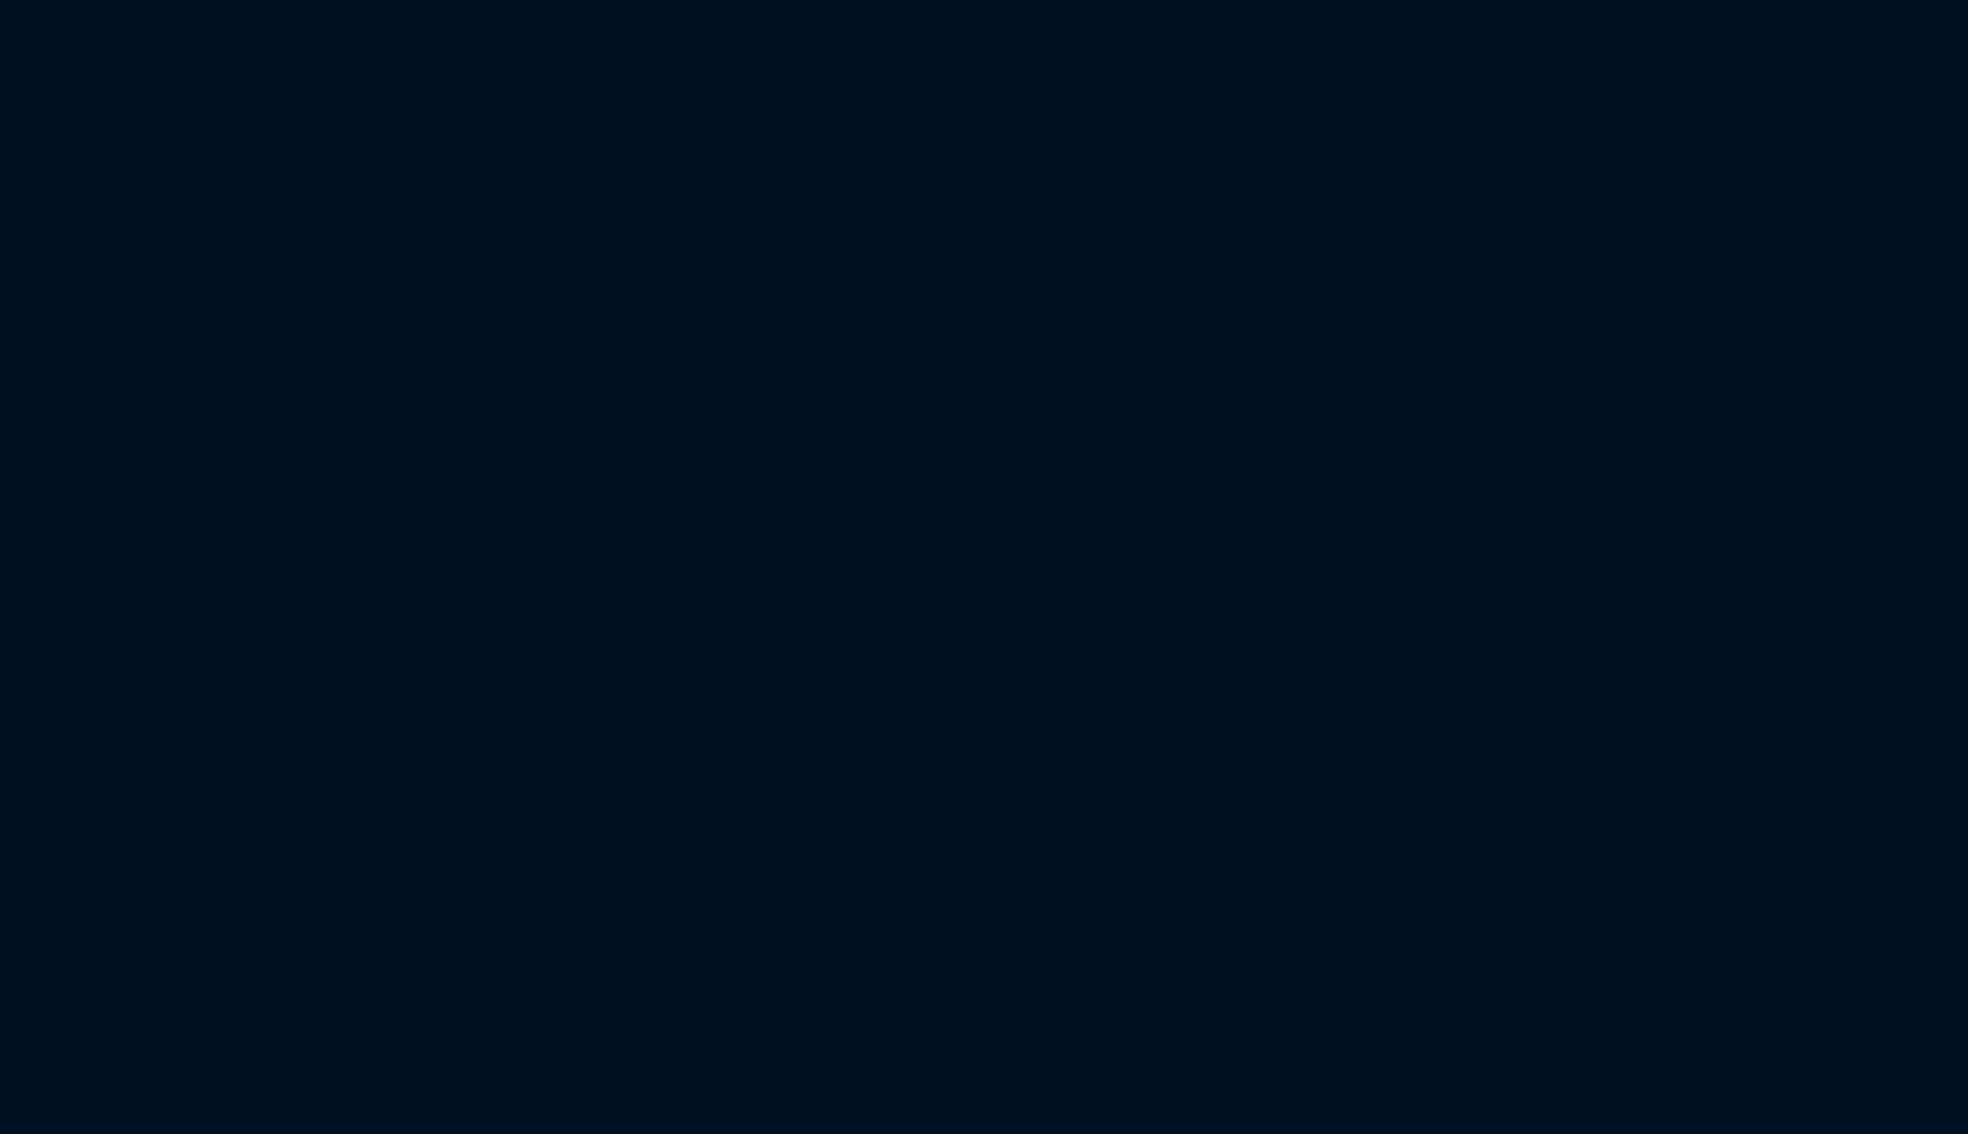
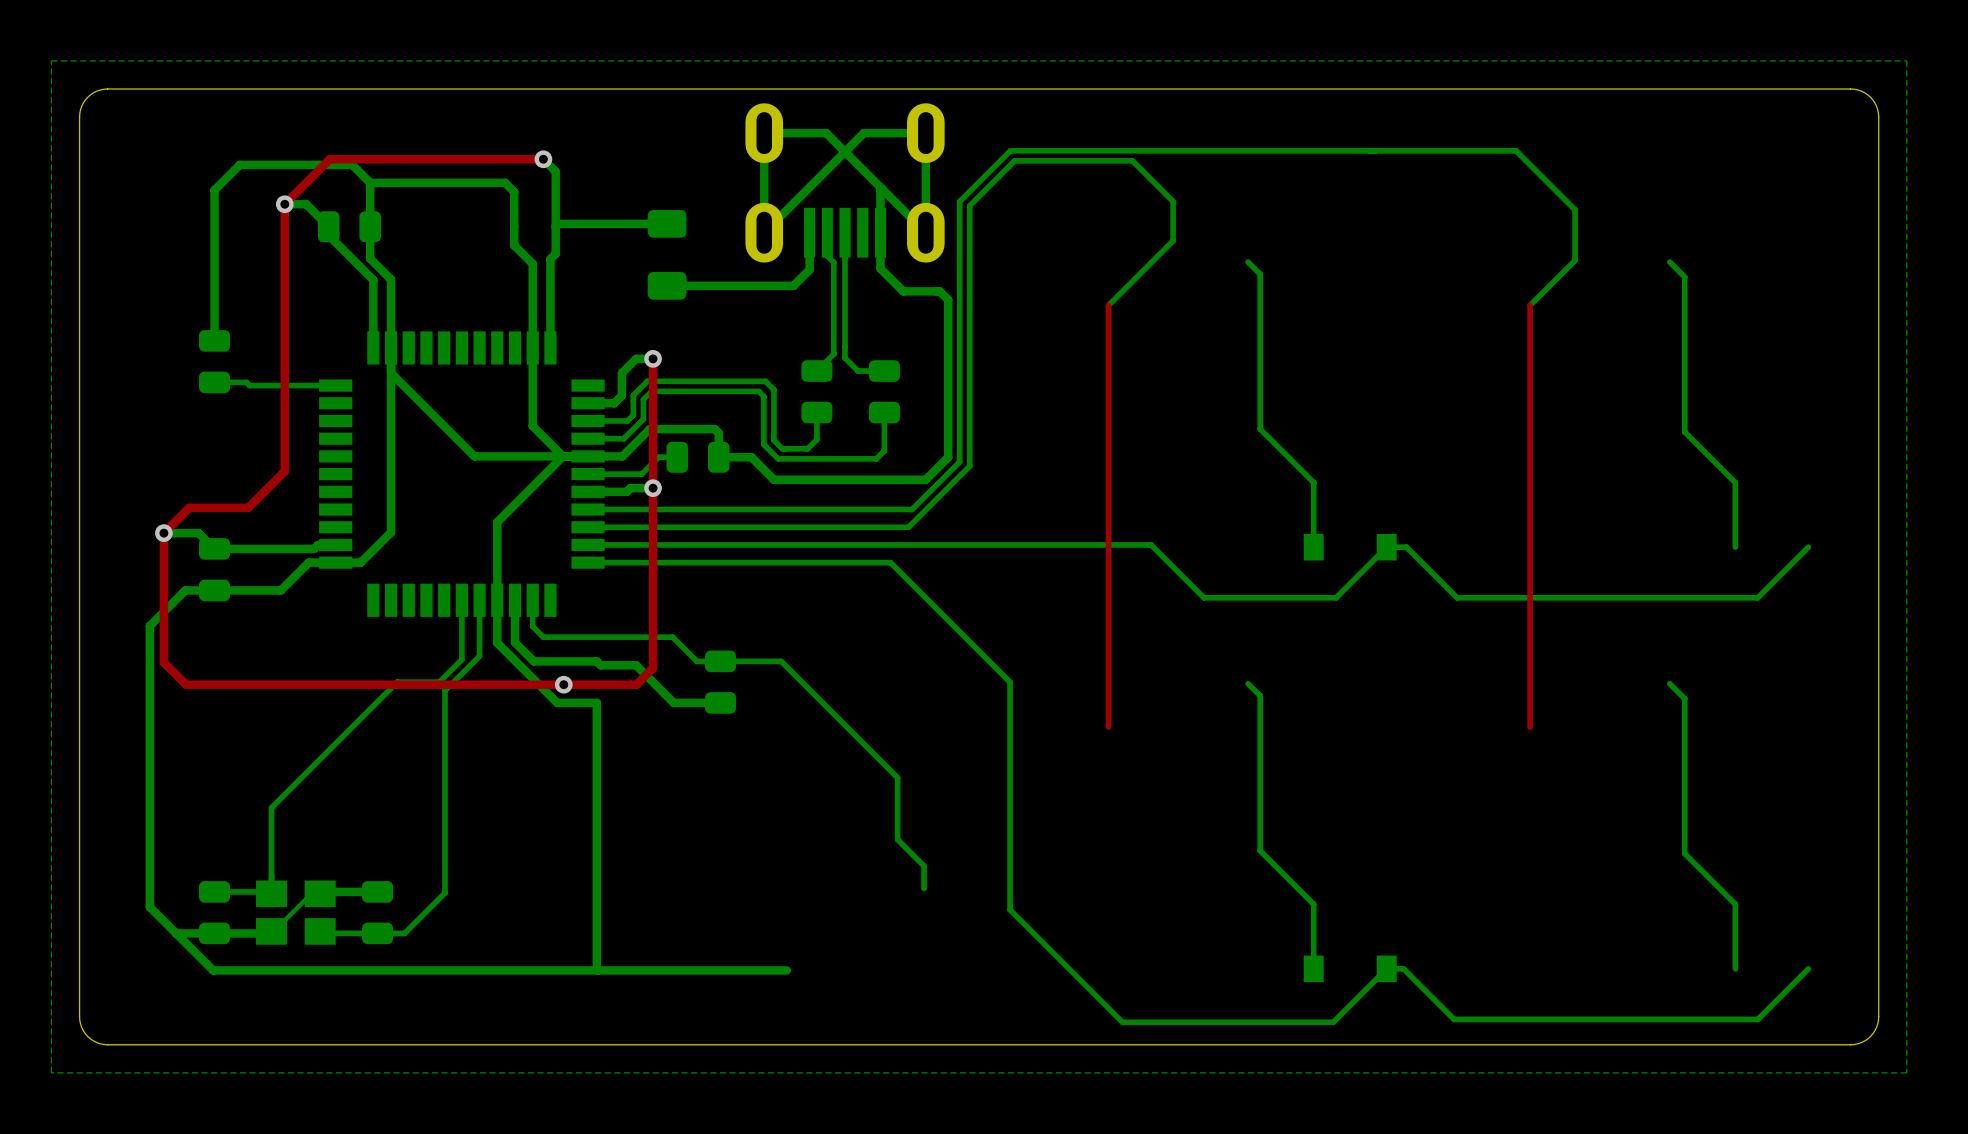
bottom zone outline: none -> (51, 60) (51, 1072) (1906, 1072) (1906, 60) (51, 60)
board edge: none -> (107, 88) (1850, 88) (1864, 92) (1874, 103) (1878, 117) (1878, 1016) (1874, 1030) (1864, 1041) (1850, 1044) (107, 1044) (93, 1041) (83, 1030) (79, 1016) (79, 117) (81, 106) (87, 97) (96, 91) (107, 88)
bottom track: none -> (764, 133) (764, 232) (863, 133) (925, 133) (925, 232) (826, 133) (764, 133)
bottom track: none -> (543, 159) (555, 171) (555, 253) (550, 259) (550, 347)
top track: none -> (543, 159) (329, 159) (284, 204) (284, 471) (248, 507) (189, 507) (163, 533) (163, 662) (186, 684) (636, 684) (653, 668) (653, 358)
via: none -> (543, 159)
bottom track: none -> (370, 182) (505, 182) (514, 191) (514, 245) (532, 263) (532, 426) (563, 456) (497, 522) (497, 642) (557, 702) (596, 702) (598, 970)
bottom track: none -> (370, 182) (352, 164) (239, 164) (214, 190) (214, 340)
bottom track: none -> (370, 182) (370, 258) (391, 279) (391, 532) (360, 562) (308, 562) (280, 590) (185, 590) (149, 625) (149, 907) (213, 970) (786, 970)
part: none -> (845, 182)
bottom track: none -> (882, 188) (880, 190) (880, 268) (903, 291) (939, 291) (948, 299) (948, 457) (925, 479) (773, 479) (751, 457) (718, 457) (718, 433) (714, 429) (649, 429) (622, 456) (474, 456) (391, 372)
bottom track: none -> (284, 204) (306, 204) (328, 226) (328, 235) (373, 280) (373, 347)
via: none -> (284, 204)
bottom track: none -> (667, 223) (558, 223) (555, 226)
part: none -> (349, 226)
bottom track: none -> (809, 232) (809, 269) (793, 285) (667, 285)
bottom track: none -> (827, 232) (827, 255) (833, 262) (833, 354) (816, 371)
bottom track: none -> (845, 232) (845, 358) (858, 371) (884, 371)
part: none -> (667, 254)
bottom track: none -> (1248, 262) (1260, 274) (1260, 429) (1313, 482) (1313, 547)
bottom track: none -> (1669, 262) (1684, 277) (1684, 431) (1735, 482) (1735, 547)
bottom track: none -> (1108, 305) (1173, 240) (1173, 201) (1132, 160) (1014, 160) (969, 205) (969, 466) (908, 527) (588, 527)
top track: none -> (1108, 305) (1108, 727)
bottom track: none -> (1530, 305) (1575, 260) (1575, 209) (1516, 150) (1010, 150) (959, 201) (959, 461) (912, 509) (588, 509)
top track: none -> (1530, 305) (1530, 727)
bottom track: none -> (653, 358) (636, 358) (621, 373) (621, 395) (614, 403) (588, 403)
via: none -> (653, 358)
part: none -> (214, 361)
bottom track: none -> (214, 382) (246, 382) (249, 385) (335, 385)
part: none -> (816, 391)
part: none -> (884, 391)
bottom track: none -> (816, 412) (816, 439) (807, 448) (782, 448) (773, 440) (773, 389) (765, 381) (647, 381) (633, 395) (633, 415) (627, 420) (588, 420)
bottom track: none -> (884, 412) (884, 450) (876, 458) (778, 458) (763, 444) (763, 396) (758, 391) (651, 391) (643, 399) (643, 419) (623, 438) (588, 438)
bottom track: none -> (677, 457) (658, 457) (641, 474) (588, 474)
part: none -> (698, 457)
part: none -> (461, 474)
bottom track: none -> (653, 488) (630, 488) (626, 491) (588, 491)
via: none -> (653, 488)
bottom track: none -> (163, 533) (198, 533) (214, 548) (313, 548) (317, 544) (335, 544)
via: none -> (163, 533)
bottom track: none -> (588, 544) (1151, 544) (1204, 597) (1336, 597) (1386, 547) (1406, 547) (1457, 597) (1757, 597) (1808, 547)
part: none -> (1350, 547)
bottom track: none -> (588, 562) (890, 562) (1010, 682) (1010, 909) (1122, 1022) (1333, 1022) (1386, 968) (1403, 968) (1454, 1019) (1757, 1019) (1808, 968)
part: none -> (214, 569)
bottom track: none -> (461, 600) (461, 659) (439, 682) (397, 682) (271, 807) (271, 893) (269, 891) (214, 891)
bottom track: none -> (479, 600) (479, 656) (445, 690) (445, 892) (404, 933) (322, 933) (320, 931)
bottom track: none -> (515, 600) (515, 642) (533, 661) (596, 661) (600, 665) (636, 665) (673, 702) (720, 702)
bottom track: none -> (532, 600) (532, 626) (543, 637) (672, 637) (696, 661) (781, 661) (897, 777) (897, 839) (924, 866) (924, 888)
part: none -> (720, 682)
bottom track: none -> (1248, 683) (1260, 695) (1260, 850) (1313, 904) (1313, 968)
bottom track: none -> (1669, 683) (1684, 698) (1684, 853) (1735, 904) (1735, 968)
via: none -> (563, 684)
bottom track: none -> (377, 891) (322, 891) (320, 893) (311, 893) (269, 933) (176, 933)
part: none -> (214, 912)
part: none -> (295, 912)
part: none -> (377, 912)
part: none -> (1350, 968)

